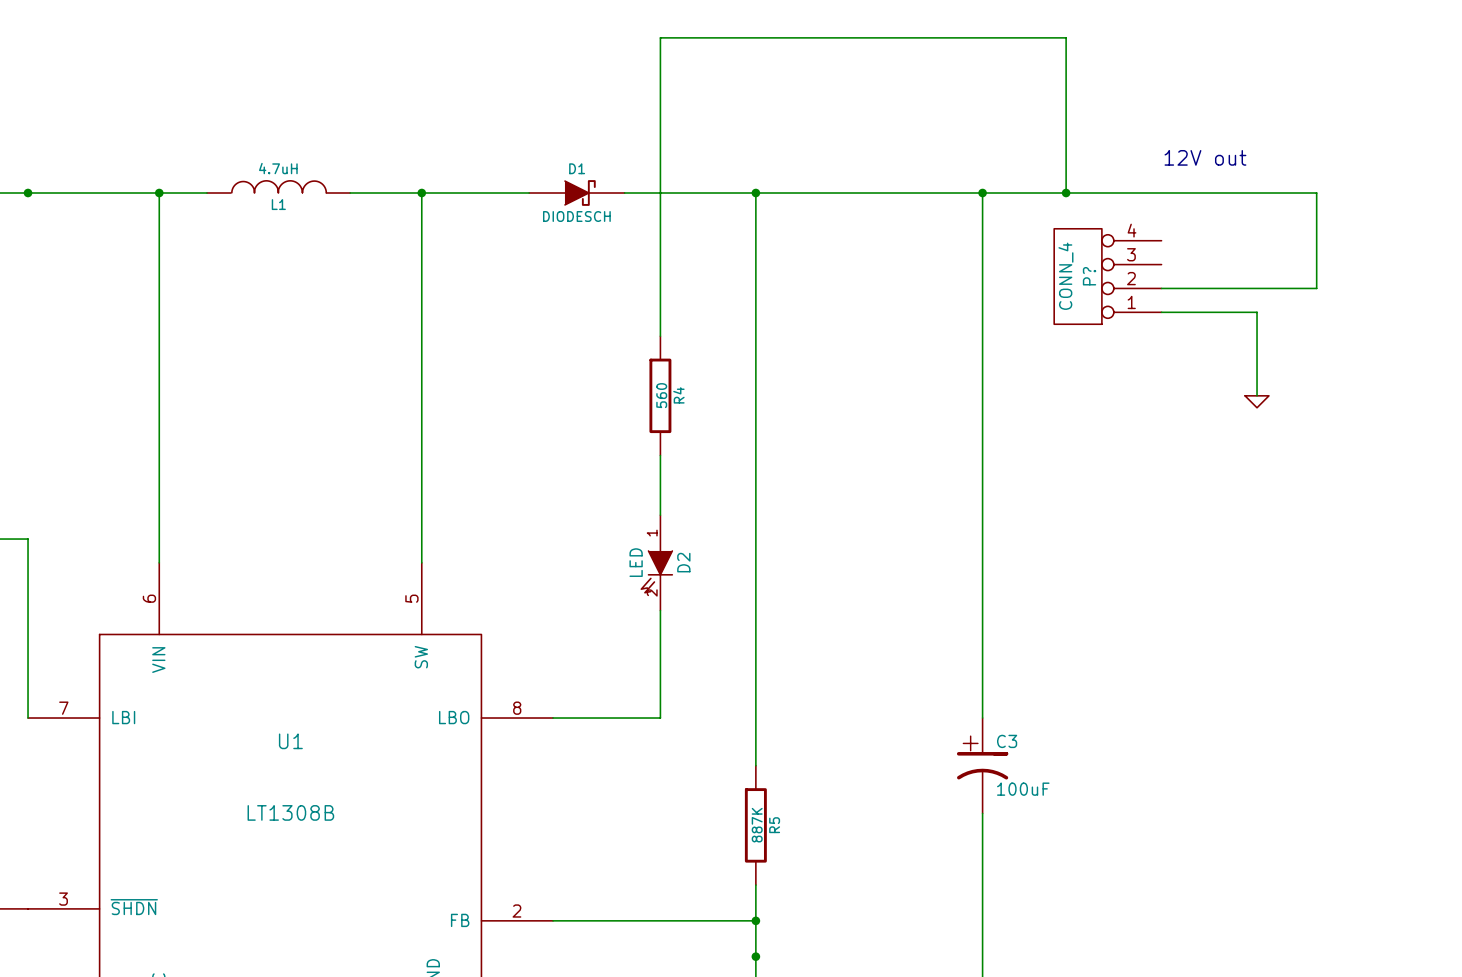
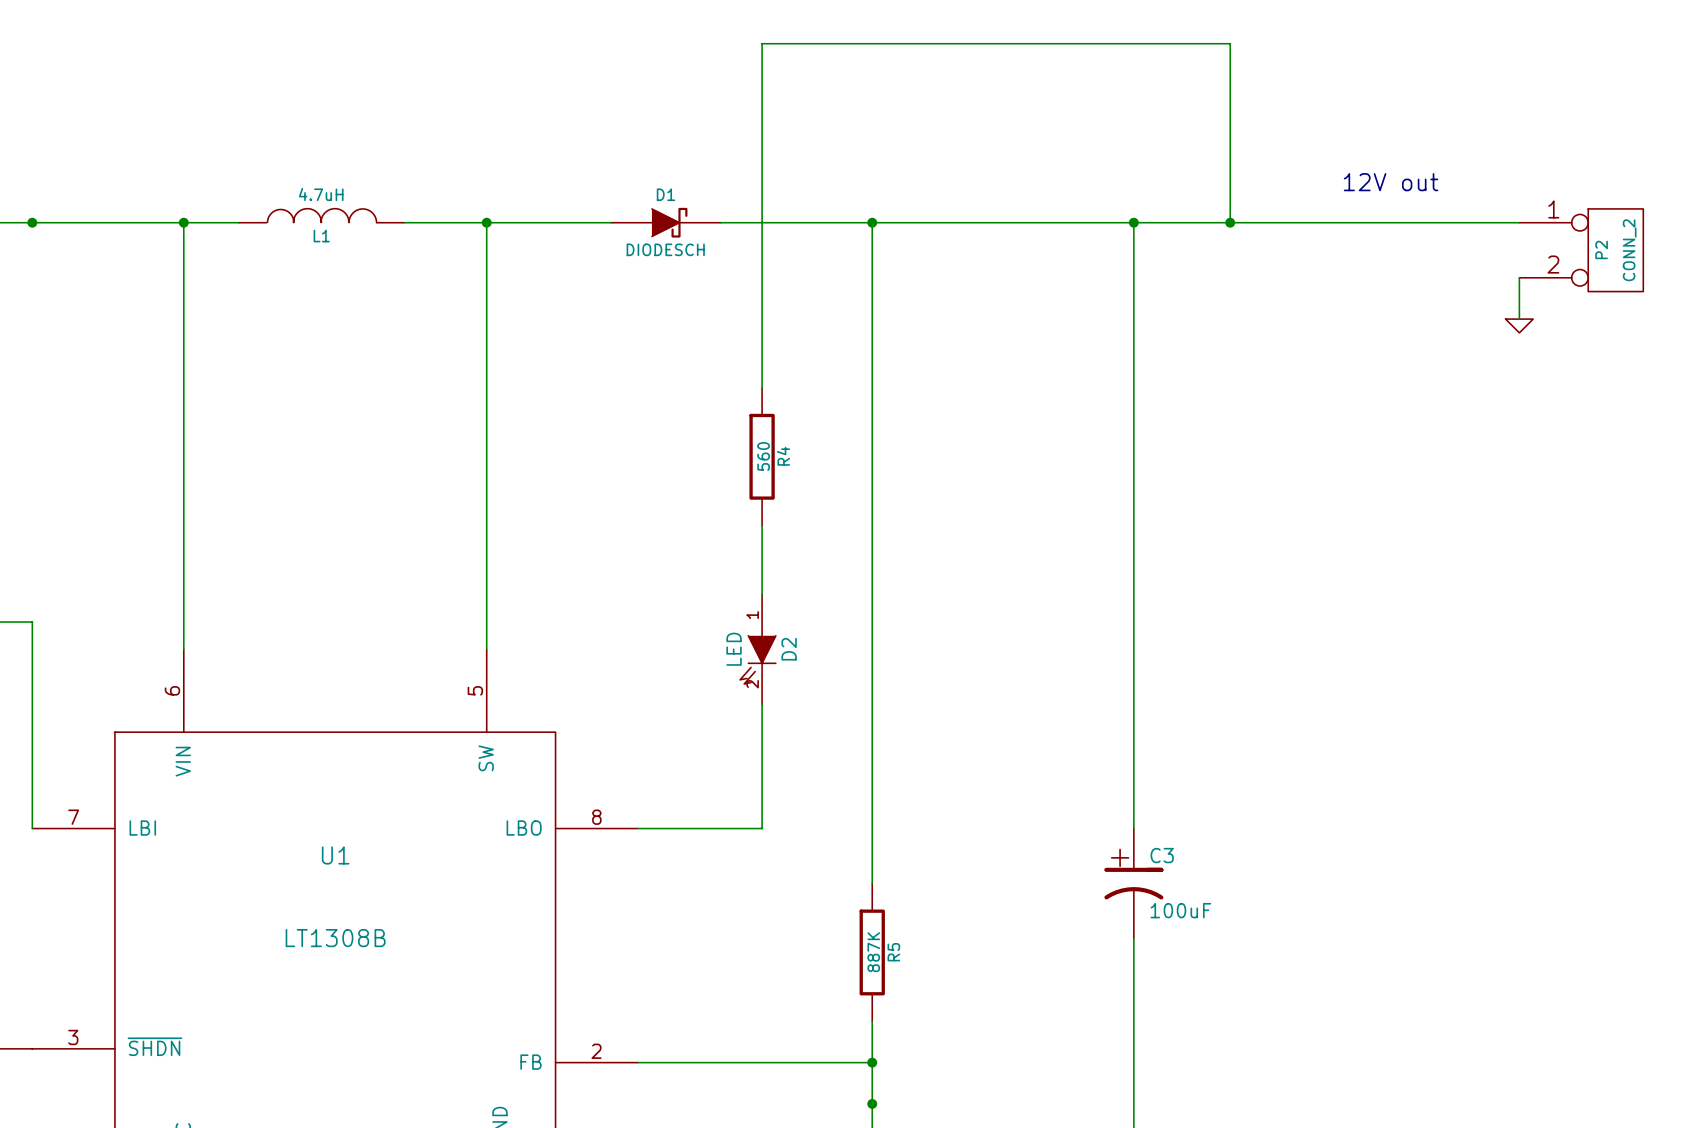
wire: (1316, 193) (1316, 240) -> none
P2: none -> CONN_2 (1581, 250)
P?: CONN_4 (1107, 276) -> none
wire: (1316, 276) (1316, 288) (1161, 288) -> none
wire: (1161, 312) (1257, 312) (1257, 395) -> none
power symbol position: (1257, 401) -> (1519, 325)

